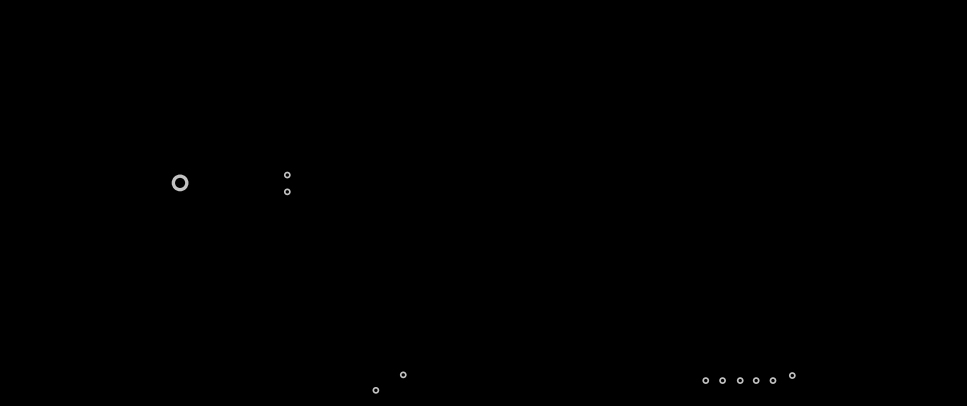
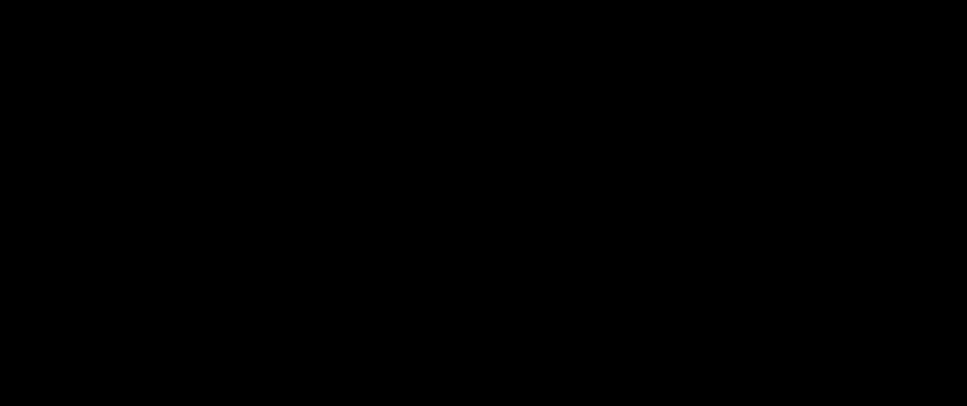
via: (287, 175) -> none
via: (180, 182) -> none
via: (287, 191) -> none
via: (403, 374) -> none
via: (792, 375) -> none
via: (705, 380) -> none
via: (722, 380) -> none
via: (740, 380) -> none
via: (756, 380) -> none
via: (772, 380) -> none
via: (375, 390) -> none

